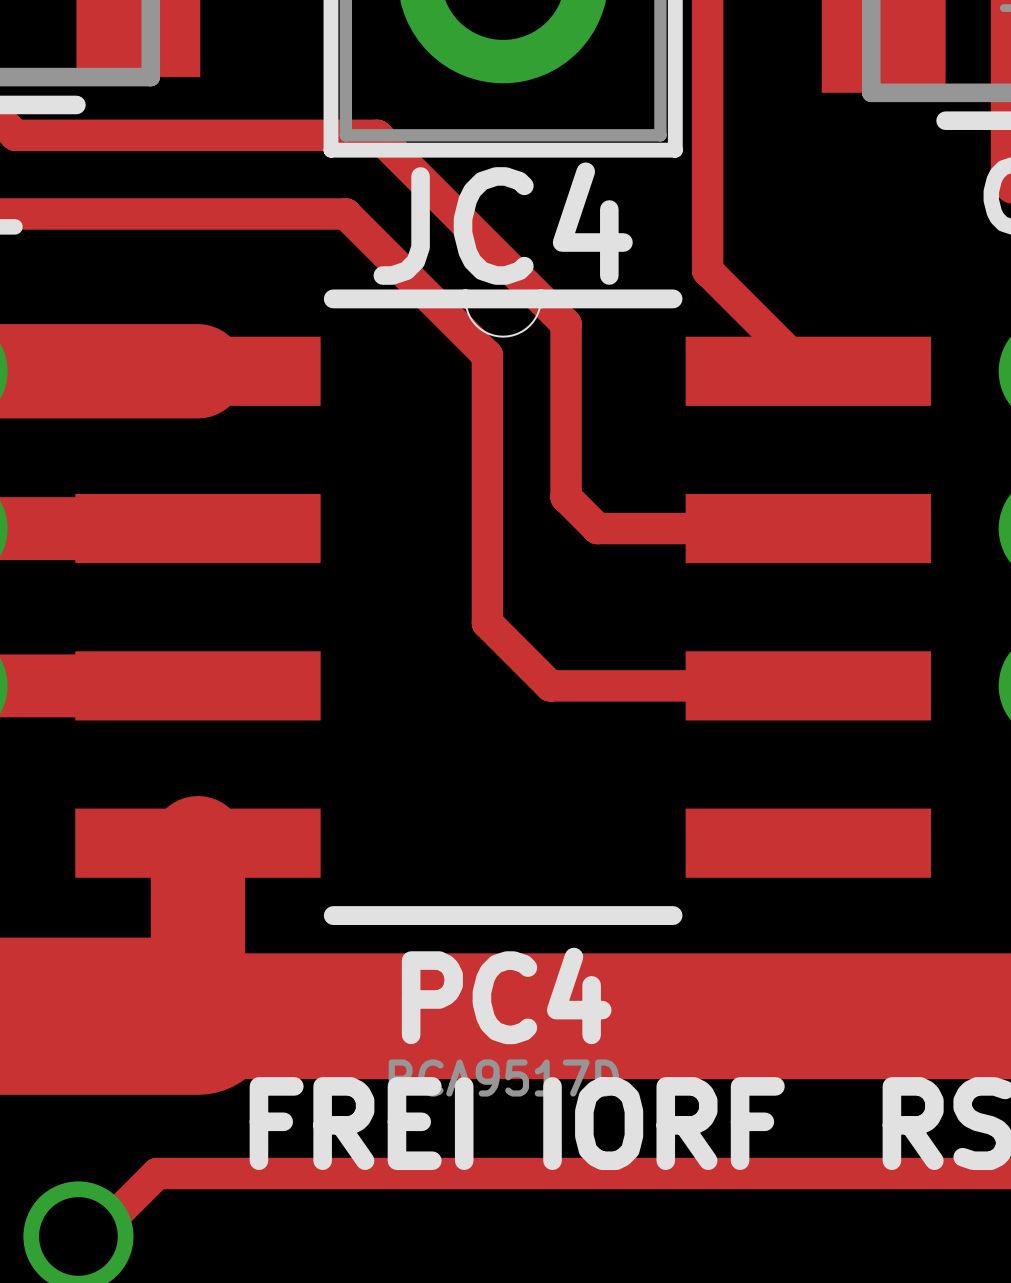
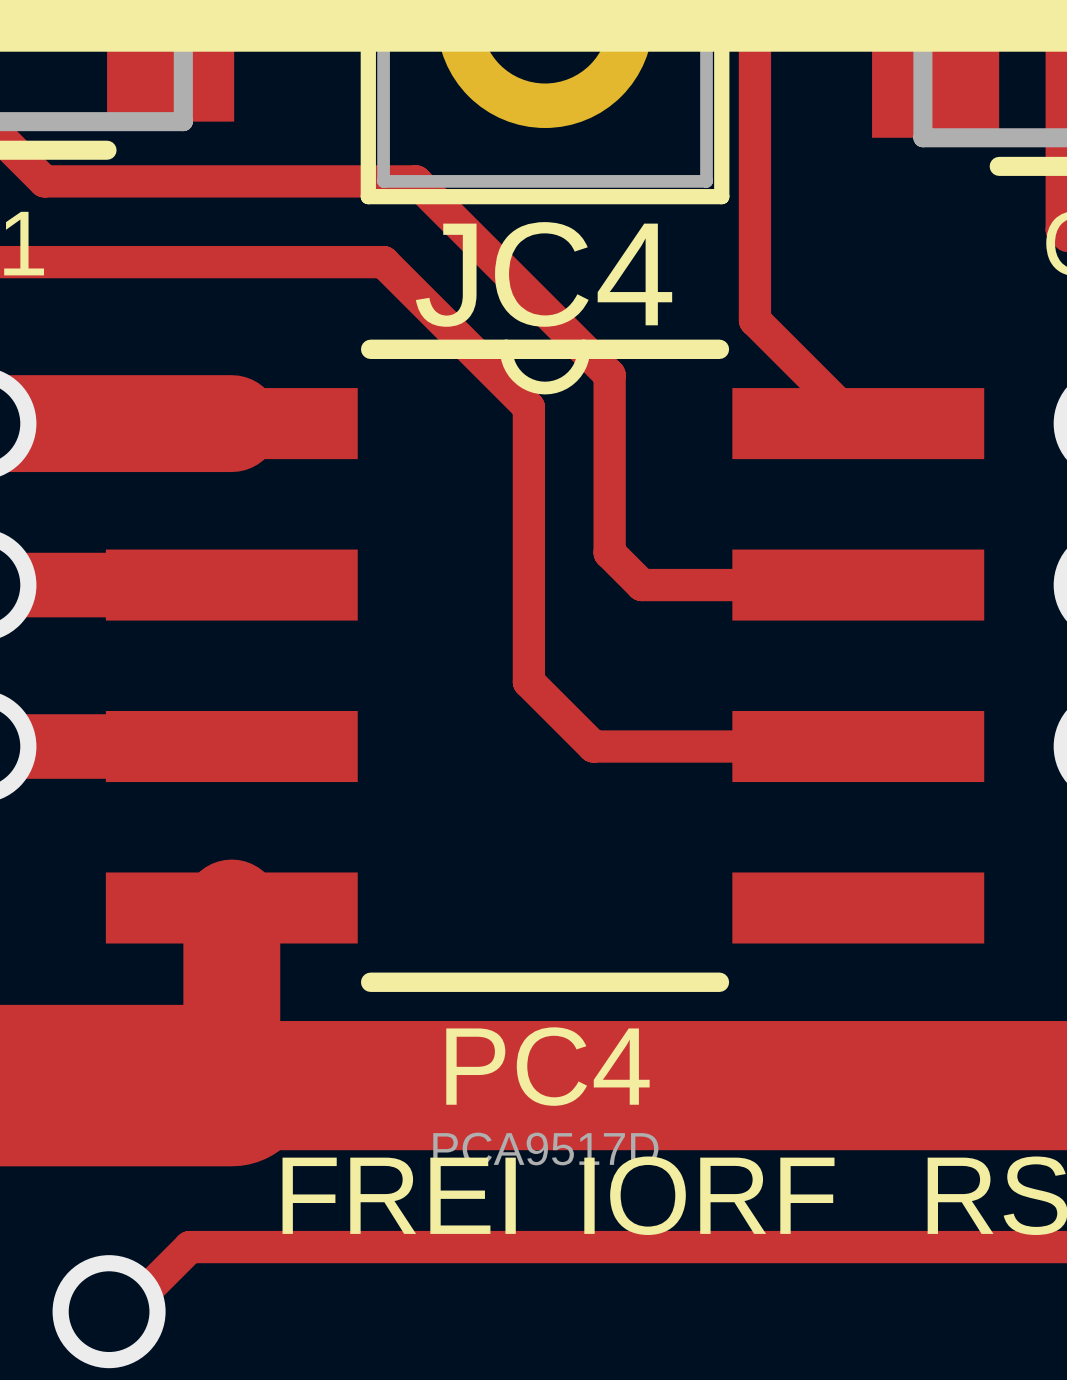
PC4 footprint: [75, 289, 932, 925] -> [105, 339, 985, 992]

